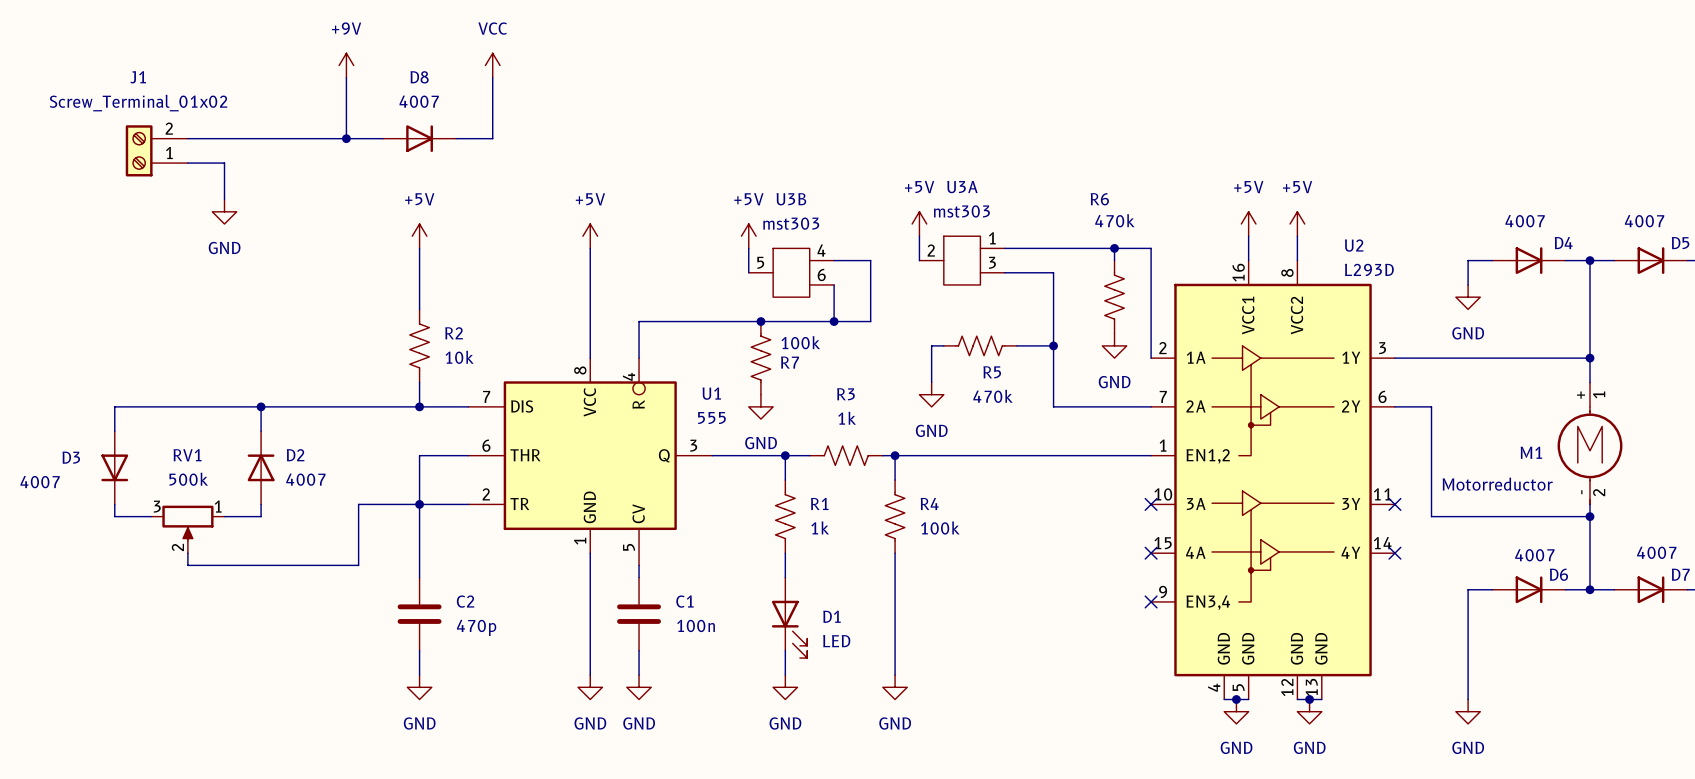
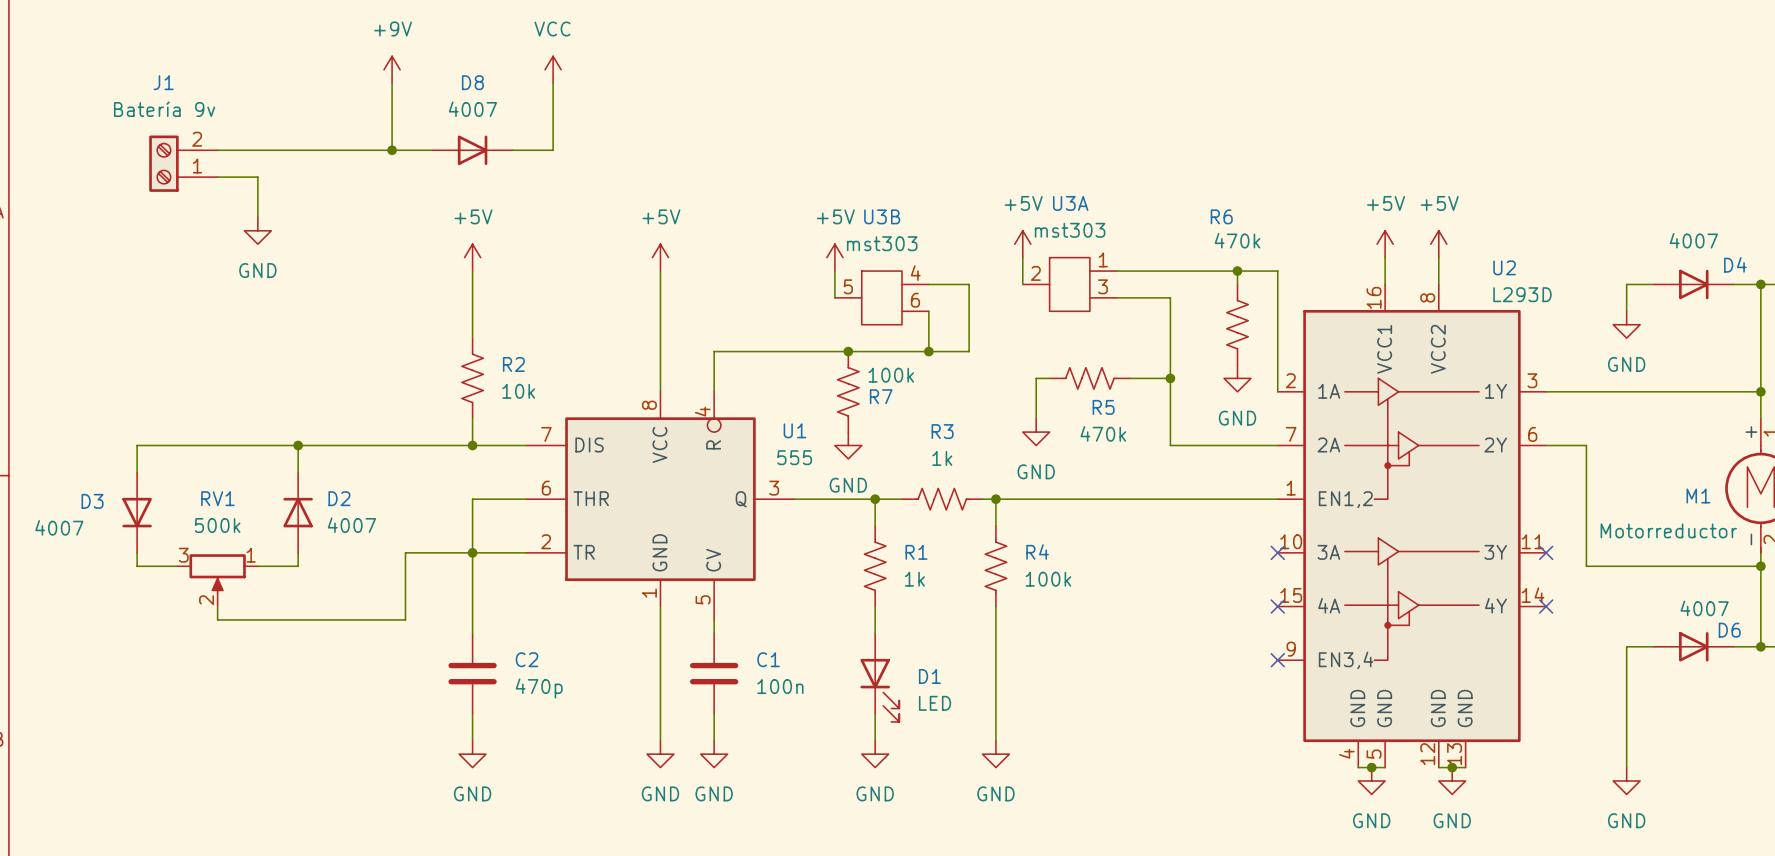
J1 value: Screw_Terminal_01x02 (138, 103) -> Batería 9v (164, 109)

